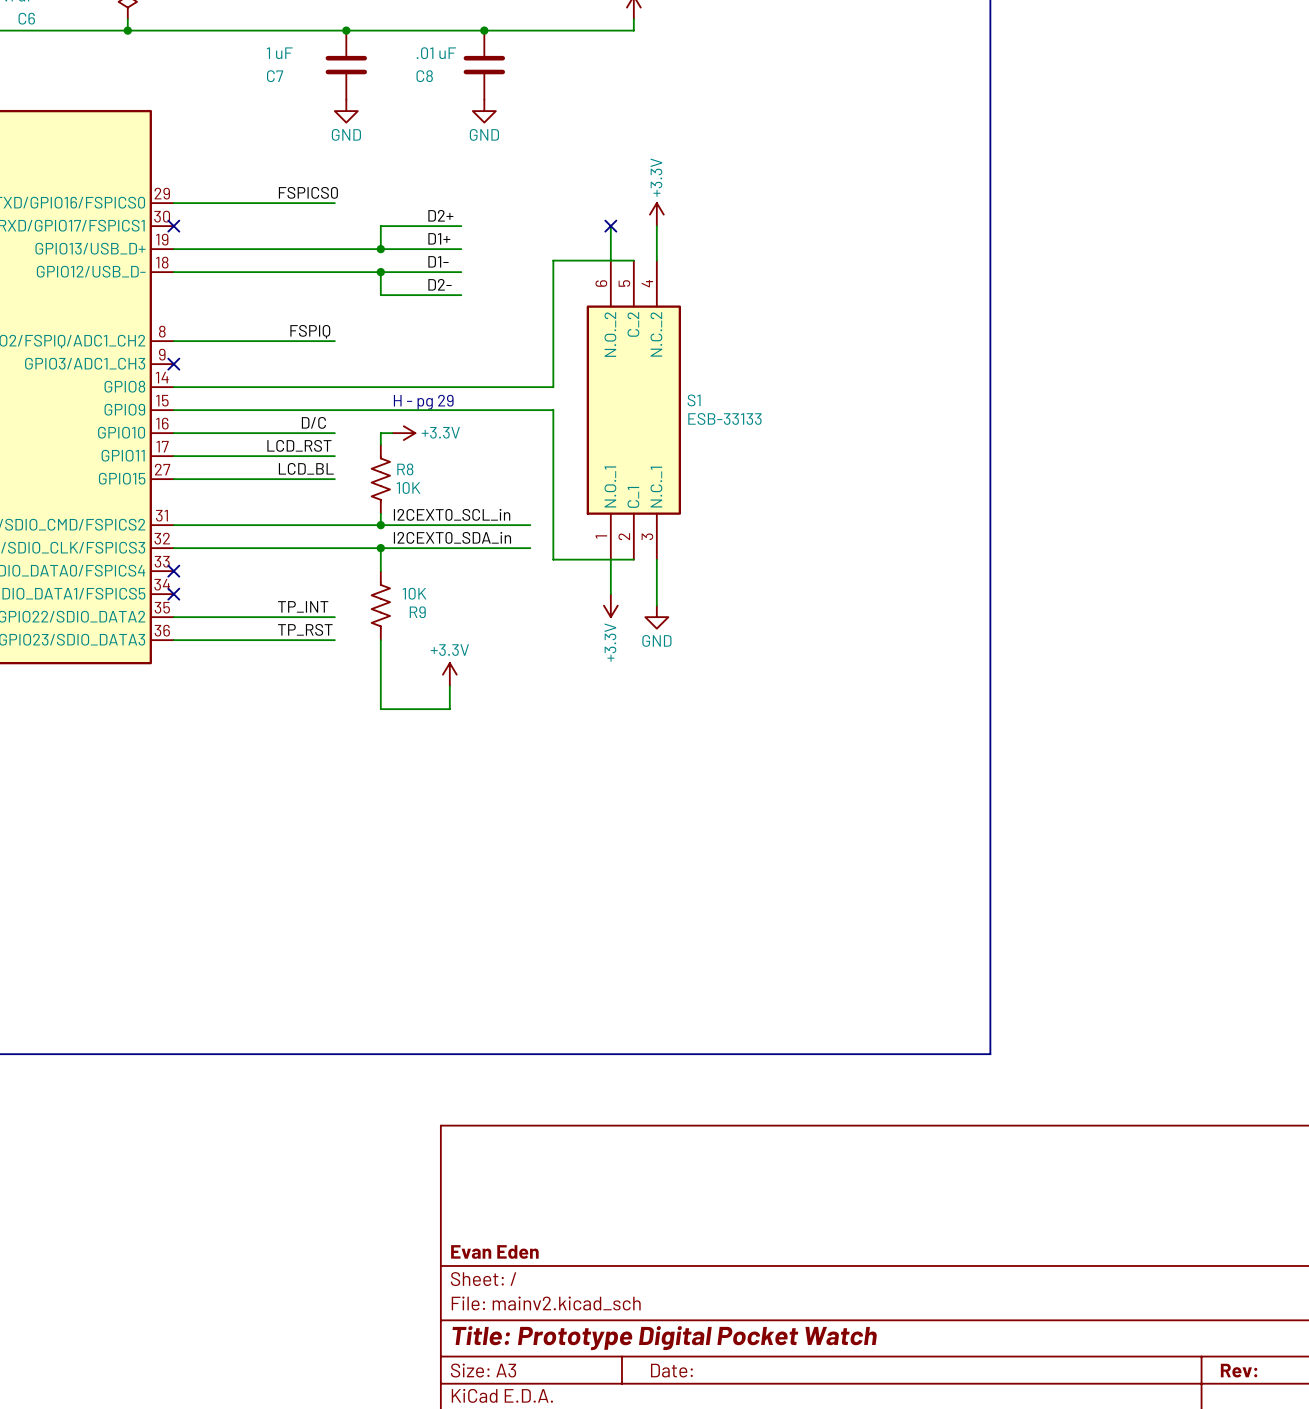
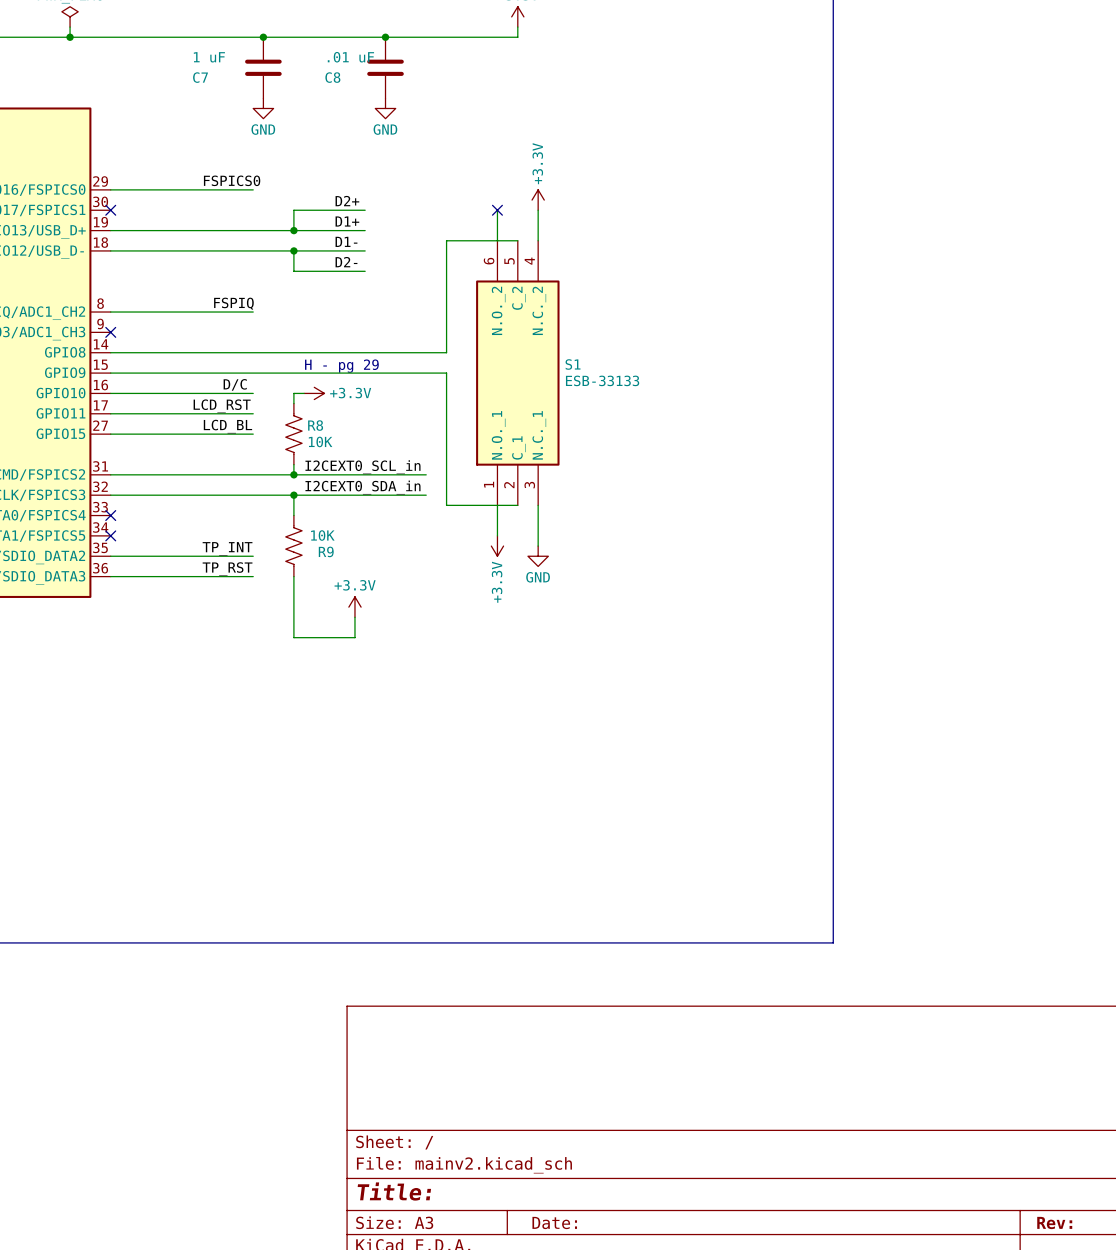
title block: Evan Eden (494, 1251) -> none
title block: Title: Prototype Digital Pocket Watch (664, 1338) -> Title: (394, 1191)

